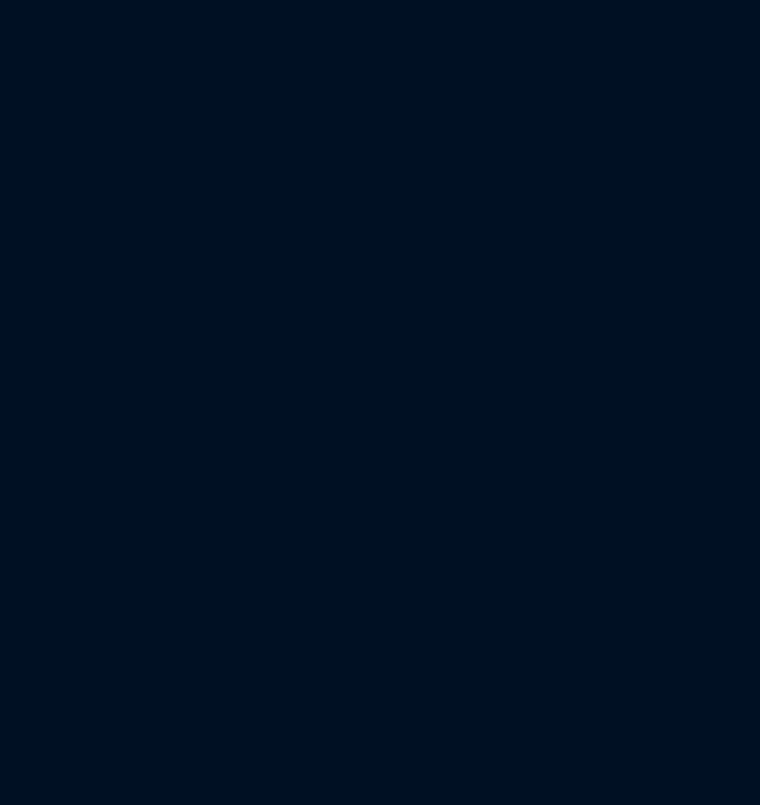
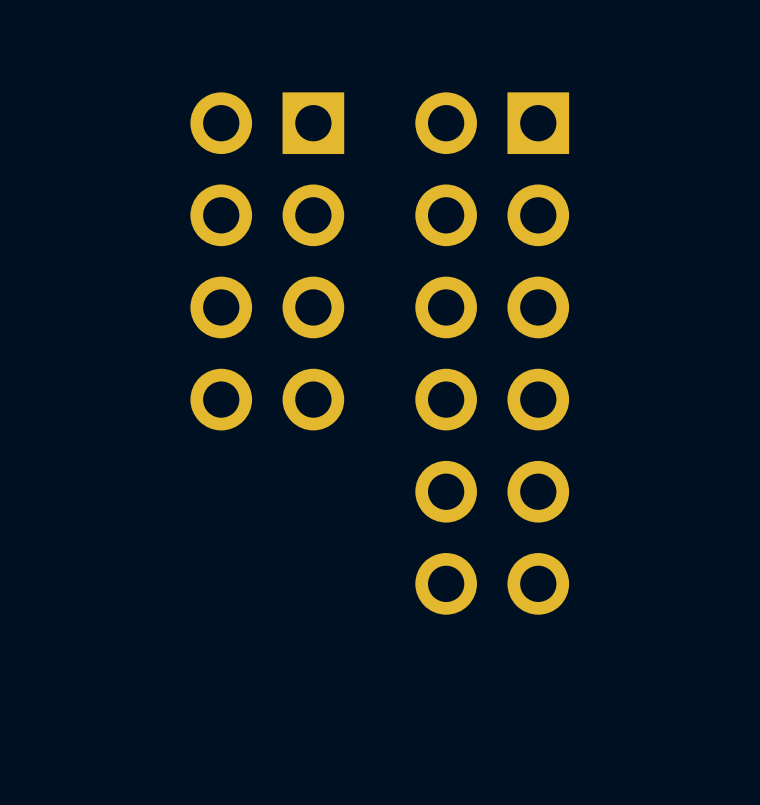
part: none -> (267, 261)
part: none -> (492, 353)

